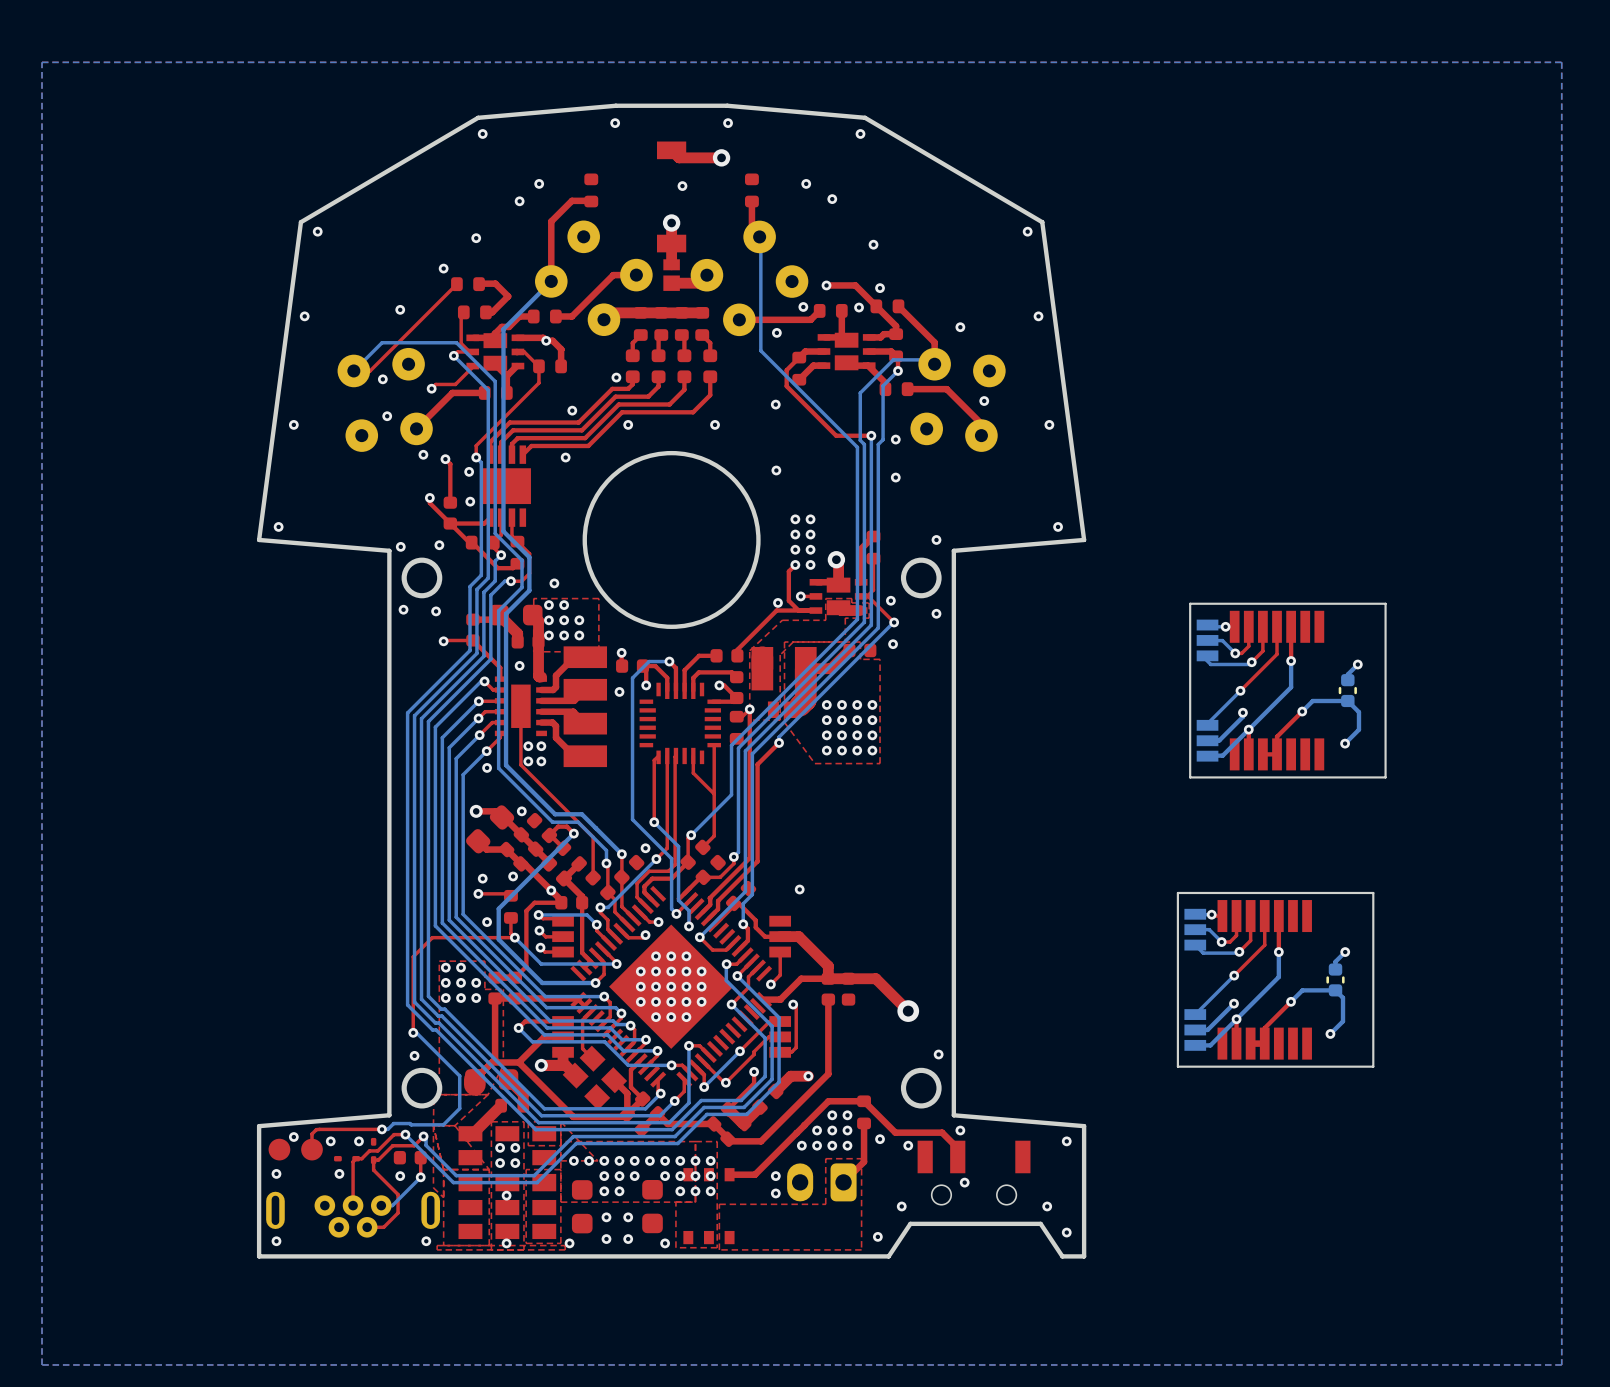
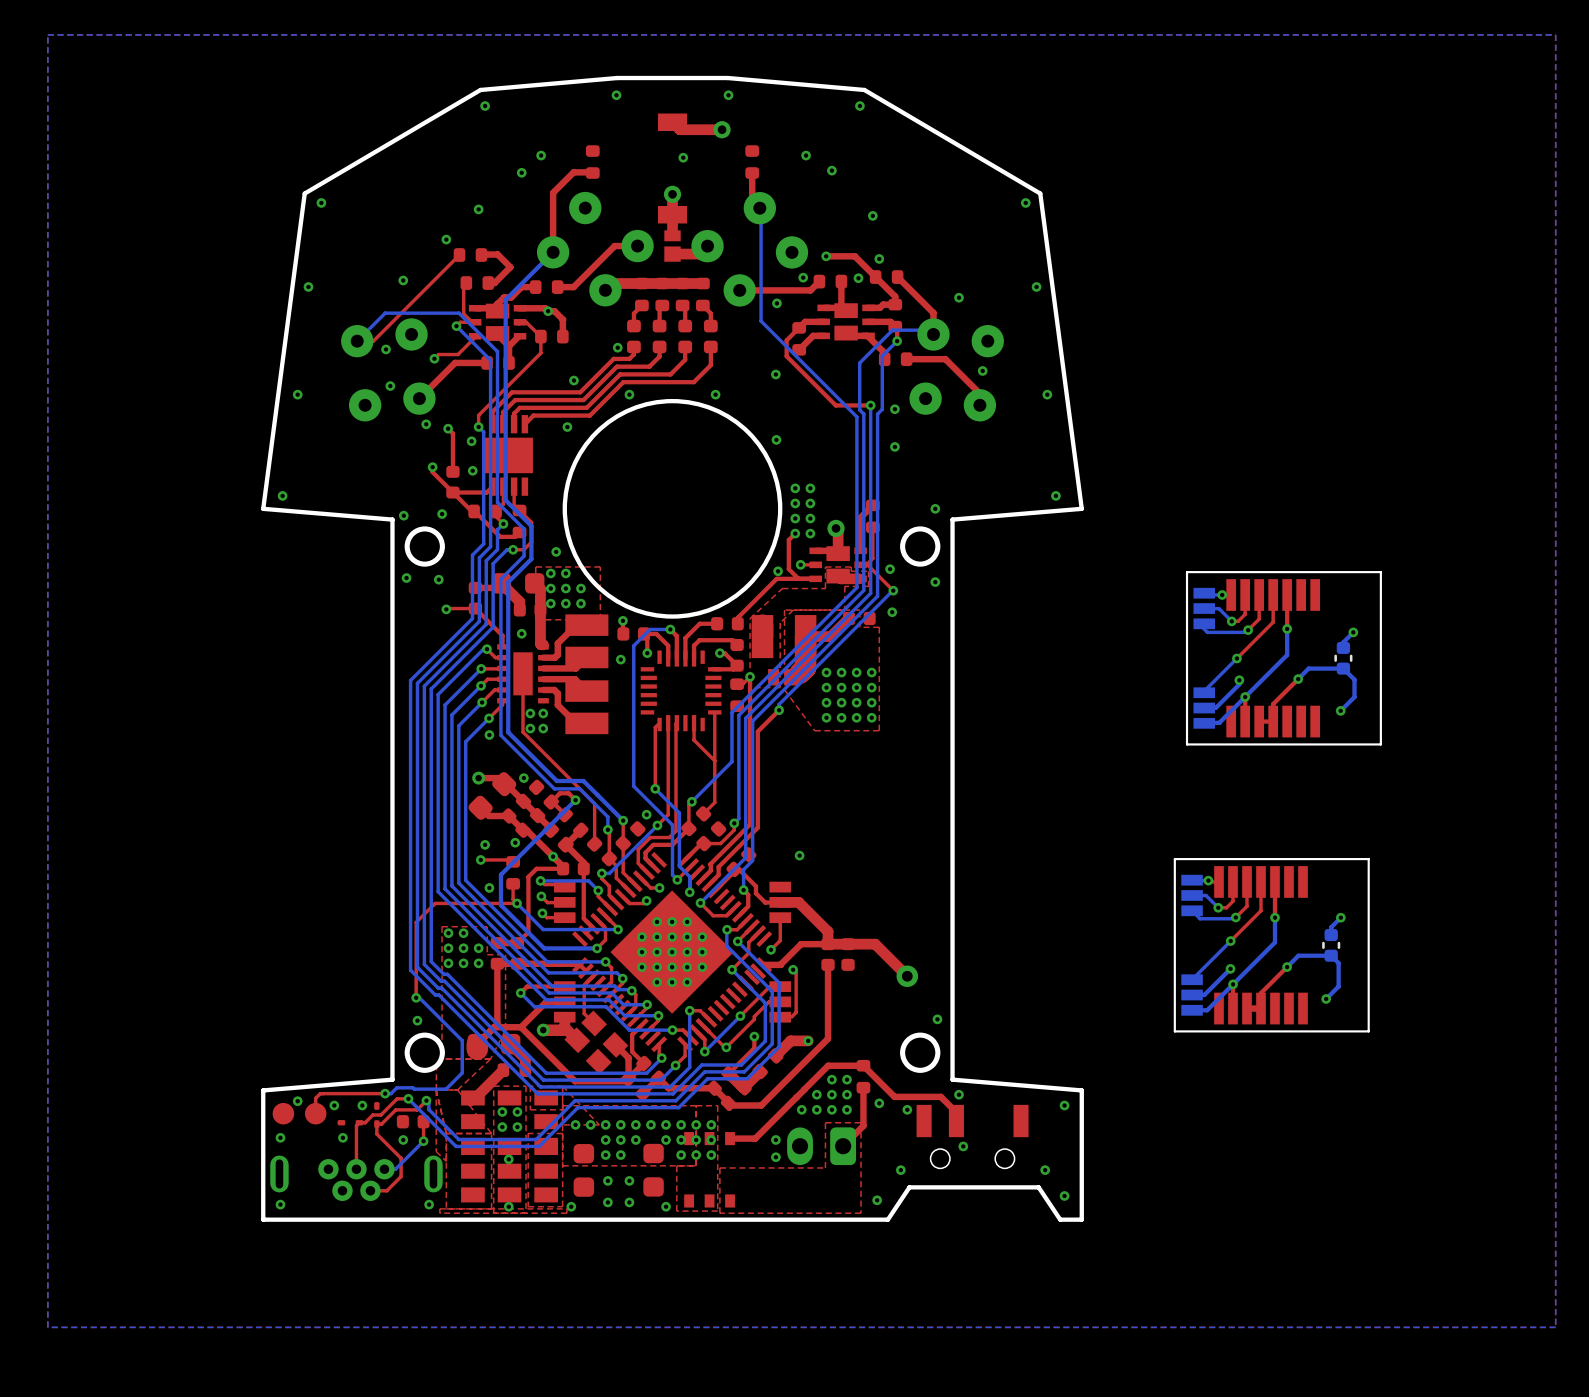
round board edge size: [582, 450, 761, 629] -> [562, 398, 783, 619]

